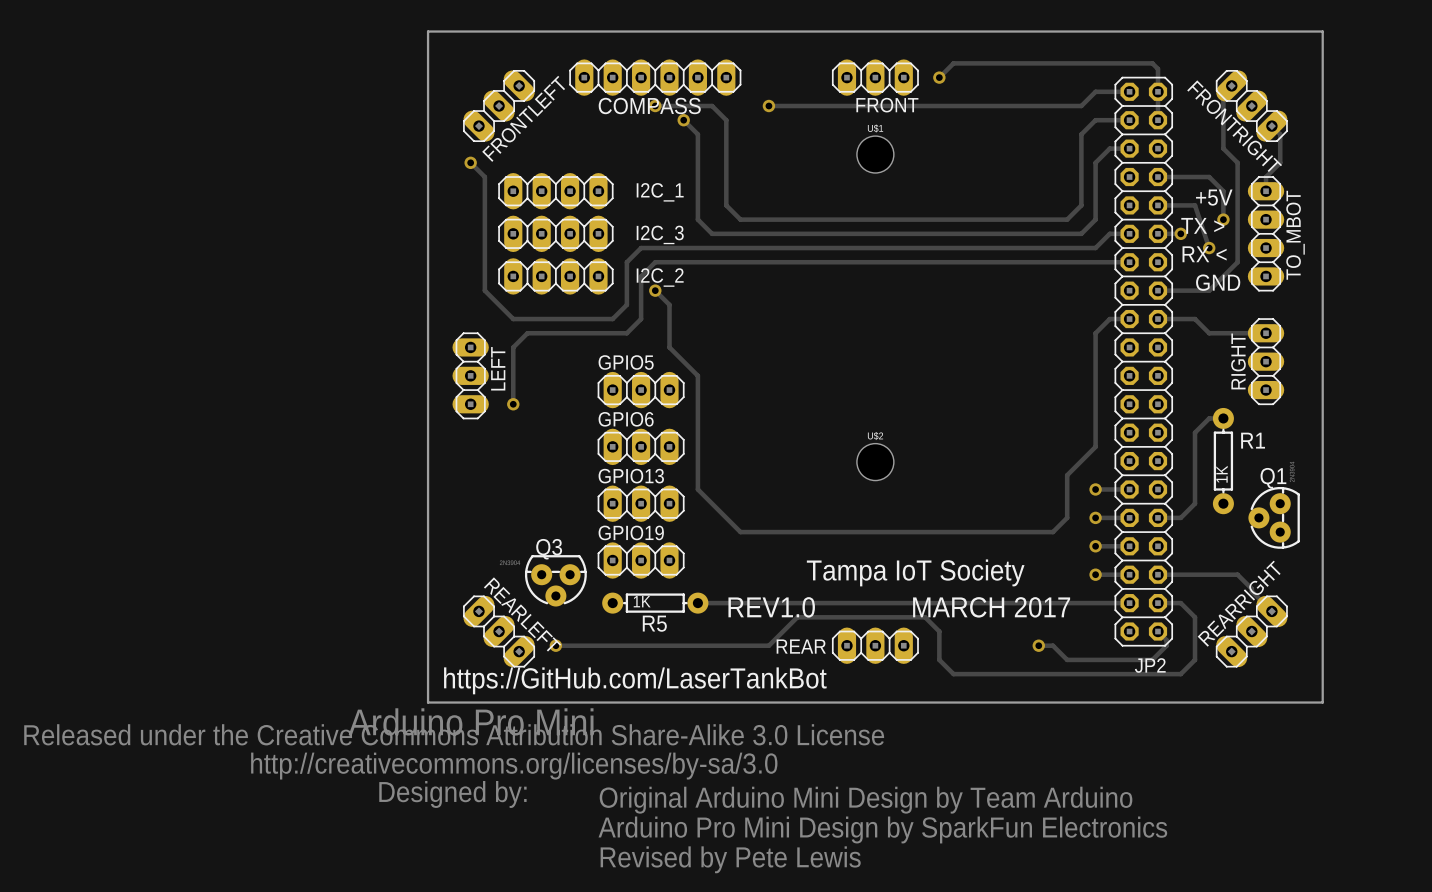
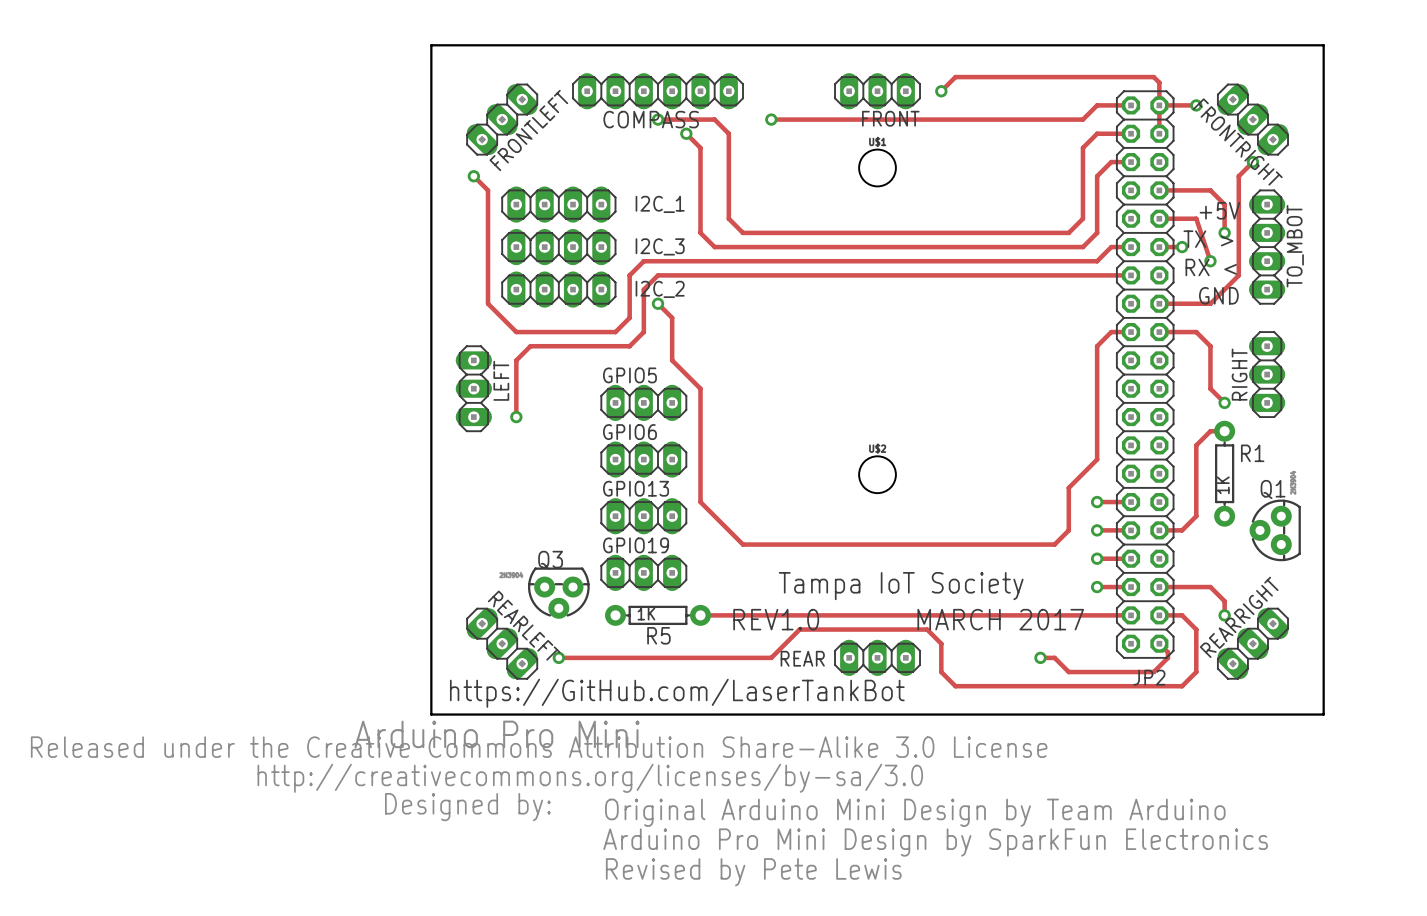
track: (1231, 85) (1223, 94) (1223, 148) (1237, 162) -> (1252, 162) (1238, 176)
track: none -> (1159, 105) (1196, 105)
via: none -> (1196, 105)
track: (1271, 126) (1280, 134) (1280, 162) (1266, 177) (1266, 191) -> none
via: none -> (1252, 162)
track: (1209, 333) (1266, 333) -> (1210, 346) (1210, 388) (1224, 402)
via: none -> (1224, 402)
track: (1209, 574) (1237, 574) (1271, 611) -> (1210, 587) (1224, 601) (1224, 615)
via: none -> (1224, 615)

